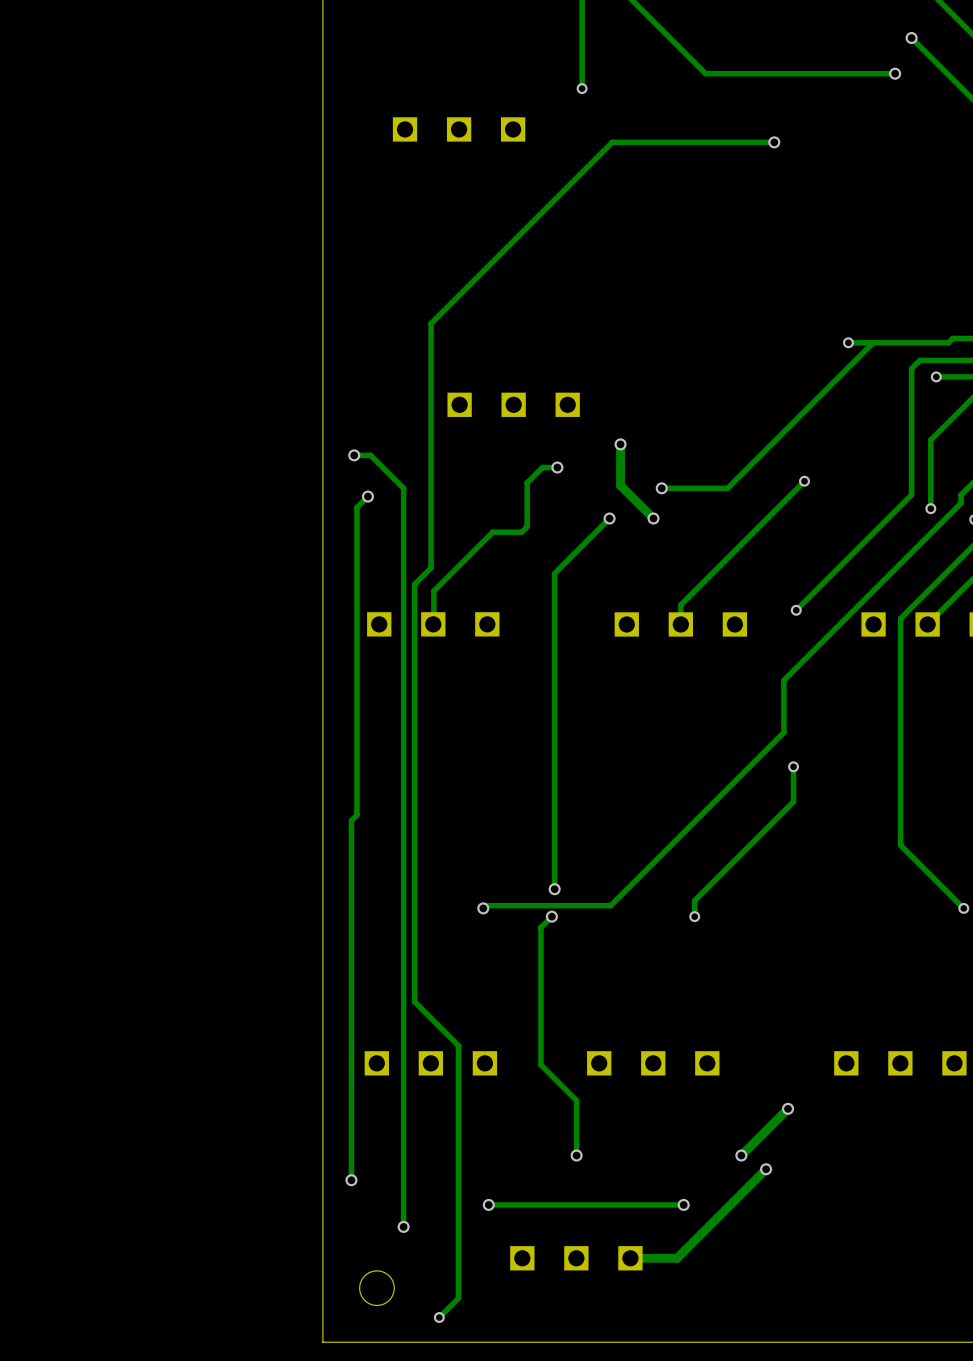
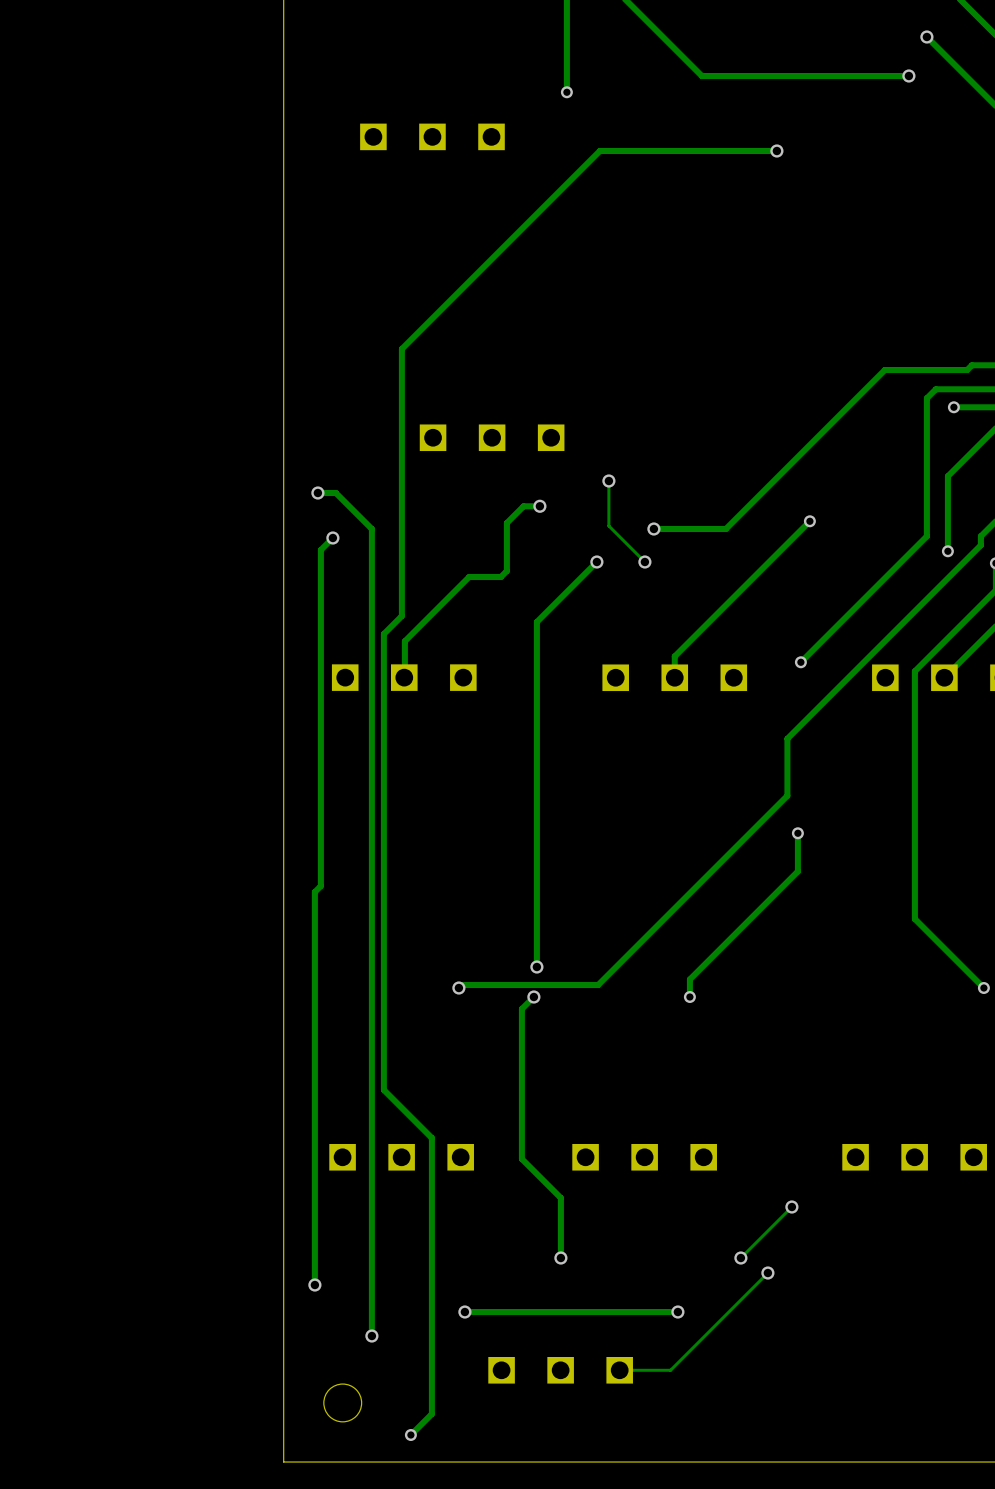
via: (848, 342) -> none
track: (873, 342) (848, 342) -> none
track width: thick (620, 444) (620, 485) (653, 518) -> thin (608, 481) (608, 526) (644, 562)
track width: thick (788, 1108) (741, 1155) -> thin (791, 1207) (740, 1258)
track width: thick (766, 1169) (677, 1258) (630, 1258) -> thin (767, 1273) (670, 1370) (619, 1370)

